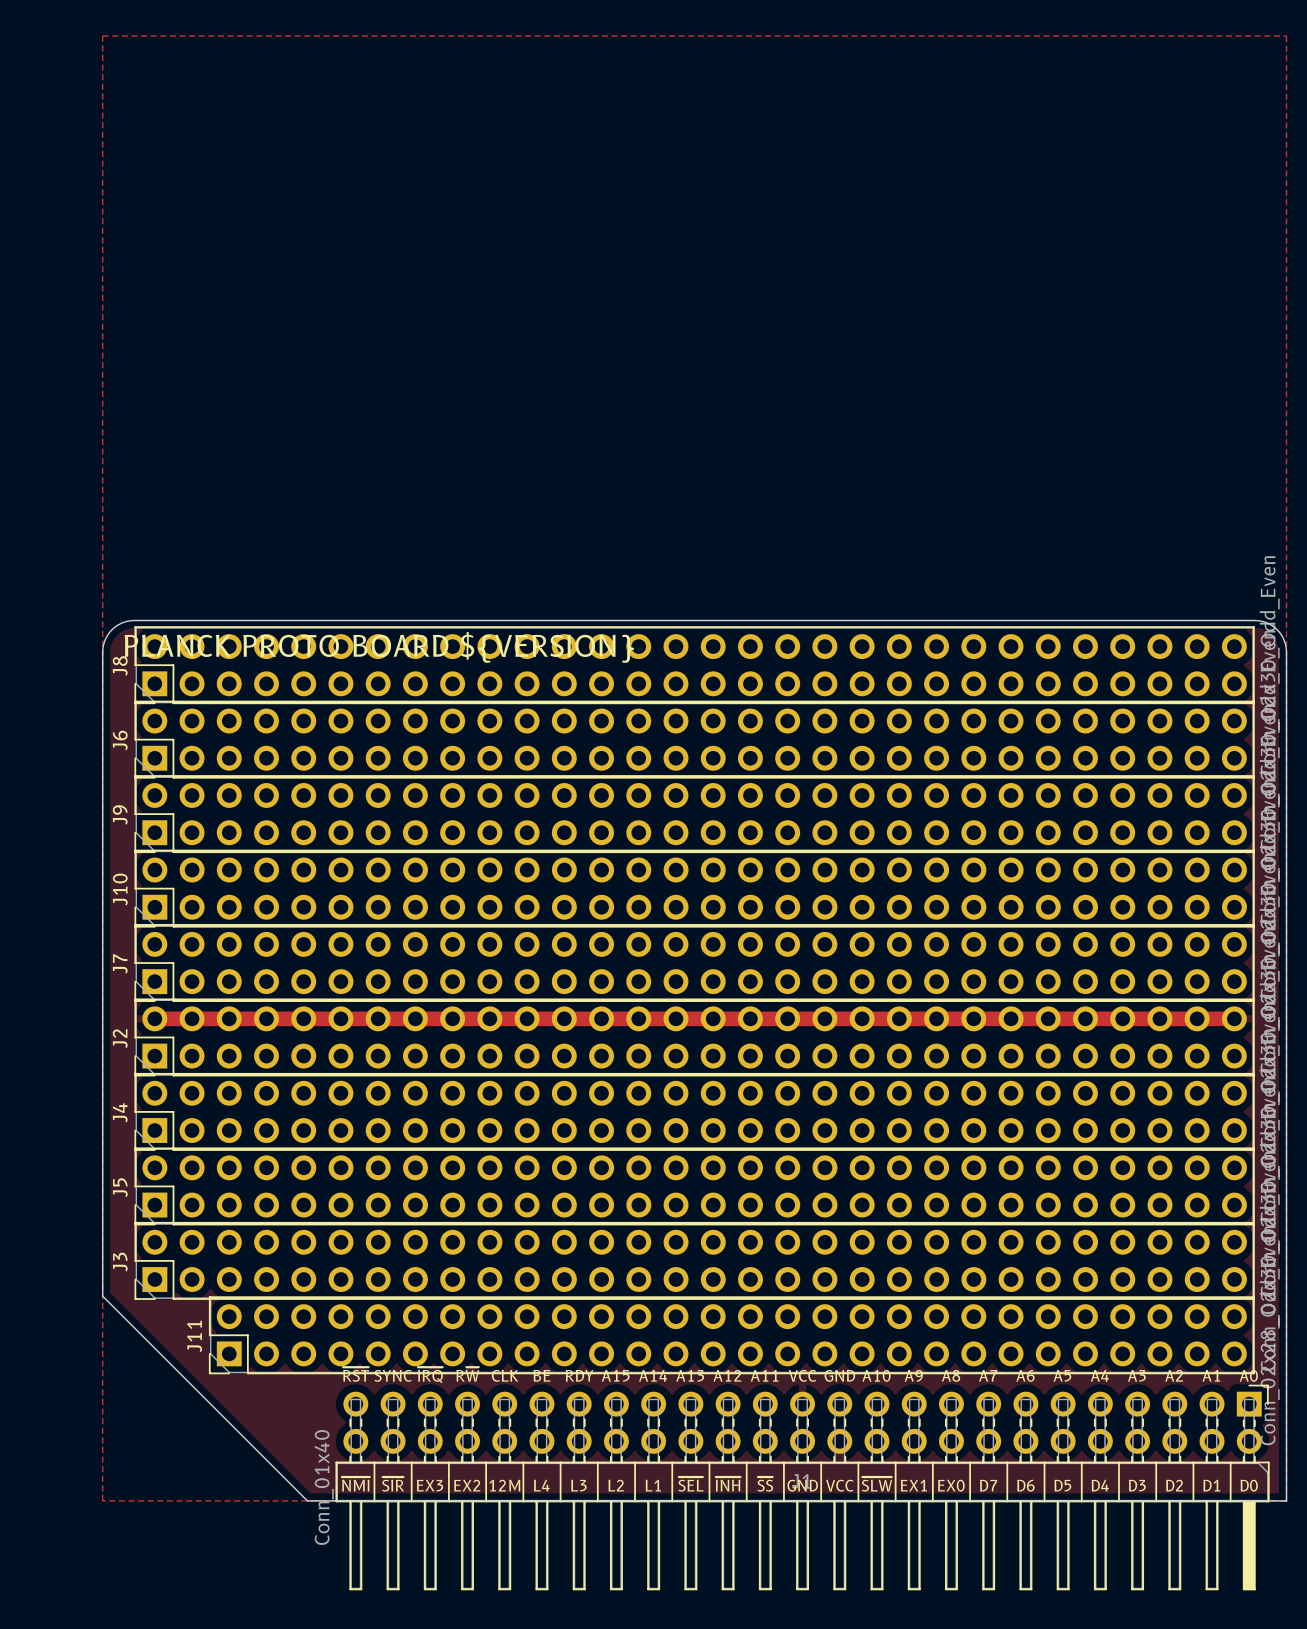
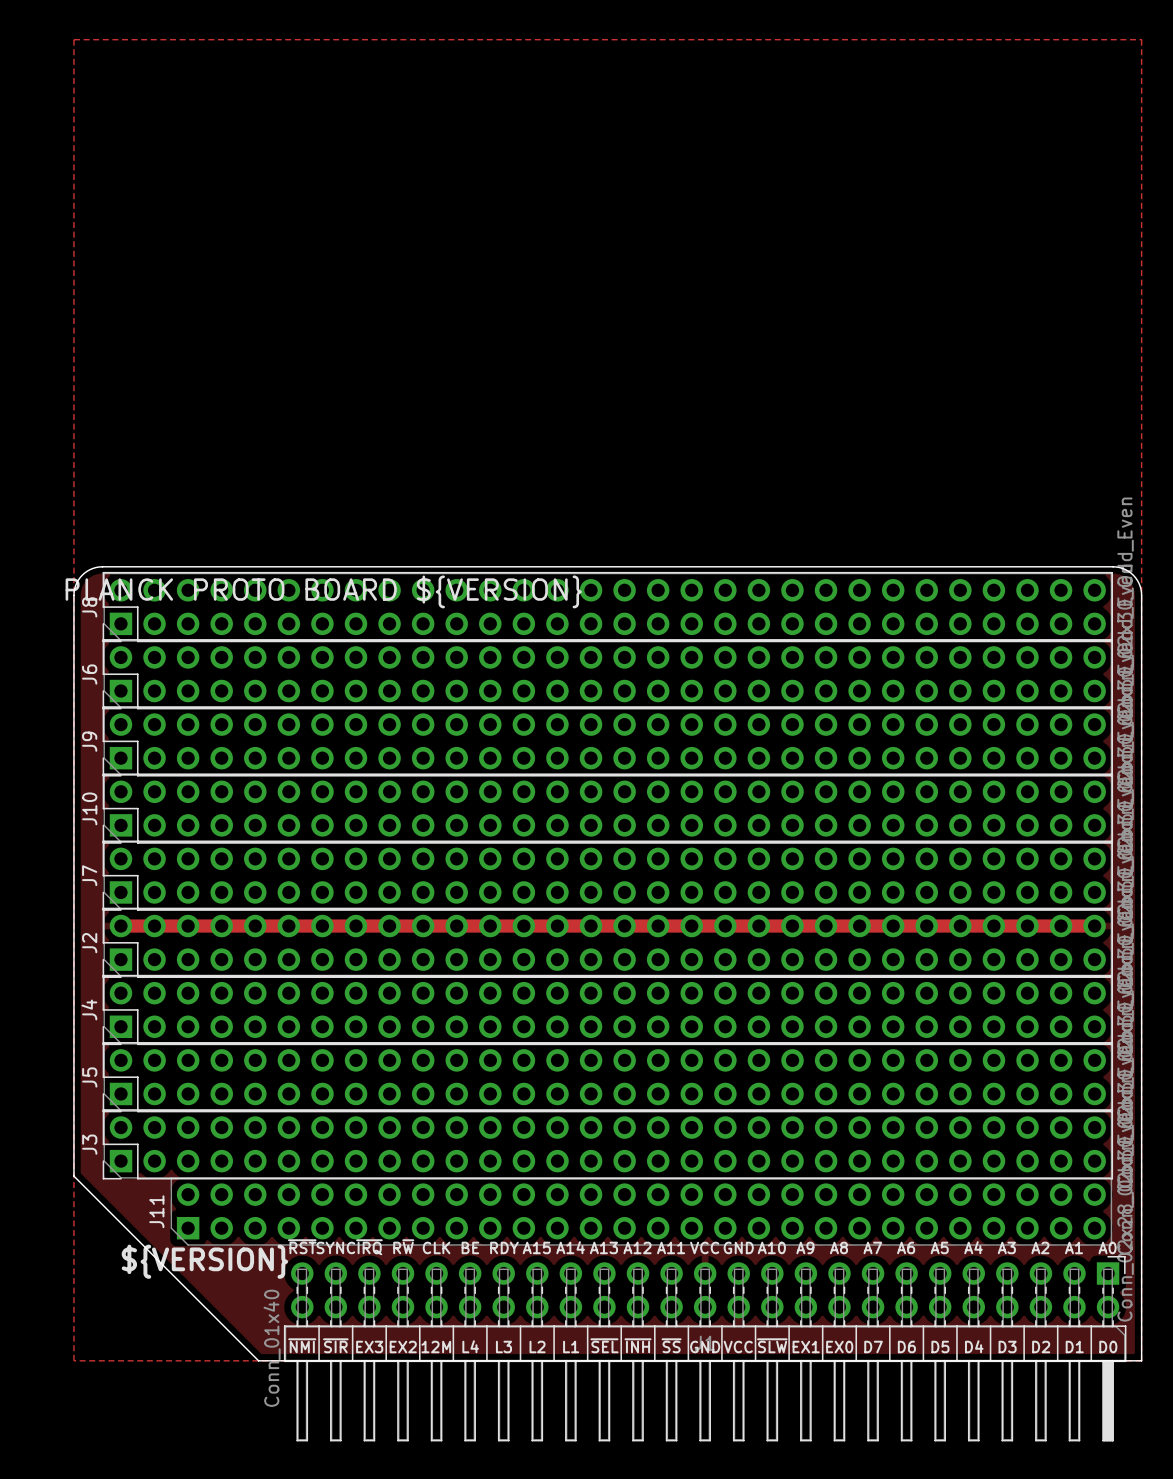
J11 footprint: [208, 1296, 1255, 1375] -> [170, 1177, 1113, 1246]
text: none -> ${VERSION} (204, 1261)

